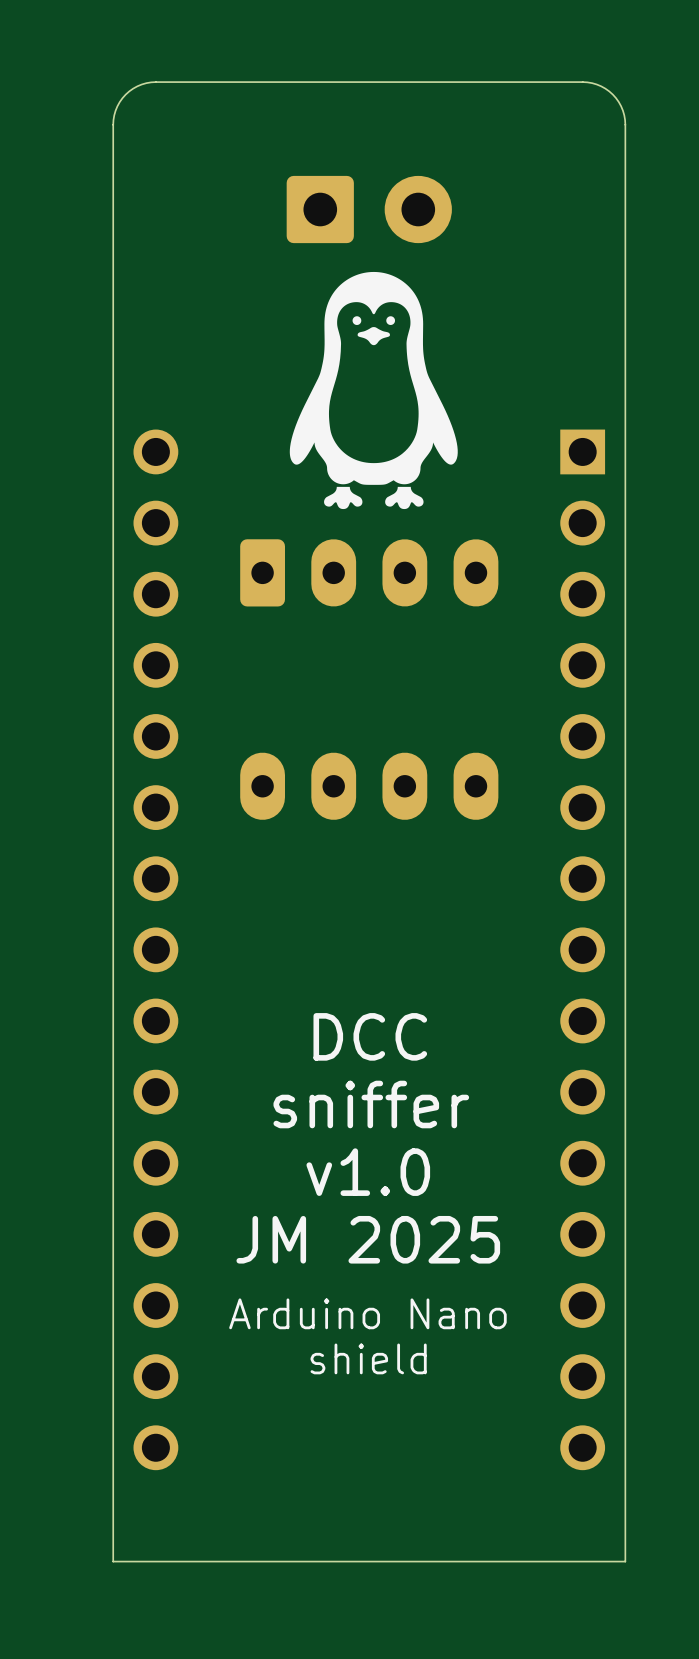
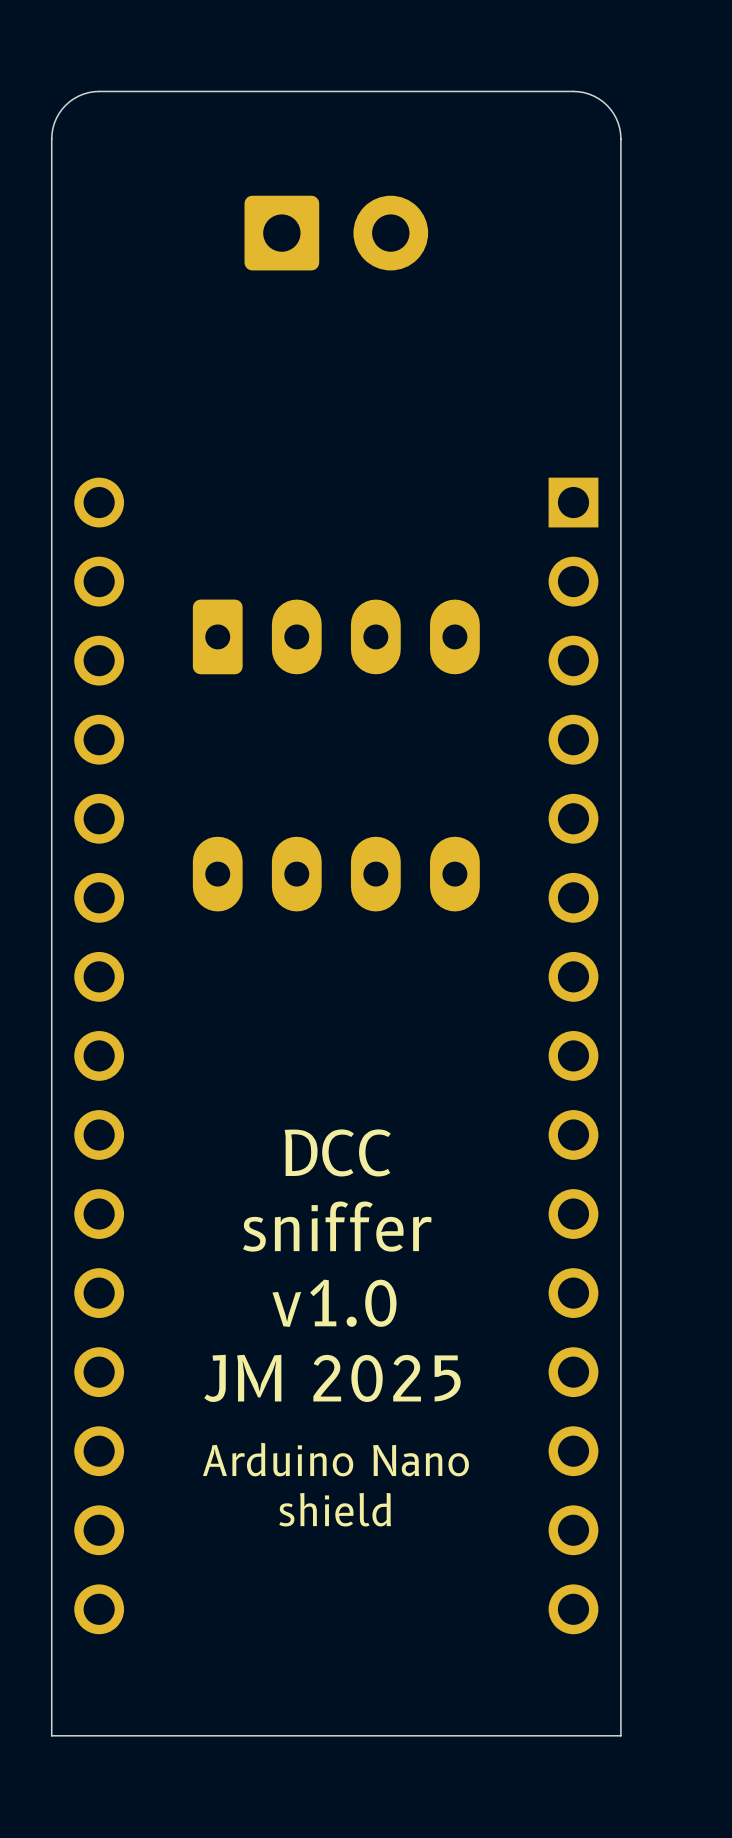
drawing: [289, 271, 458, 510] -> none

